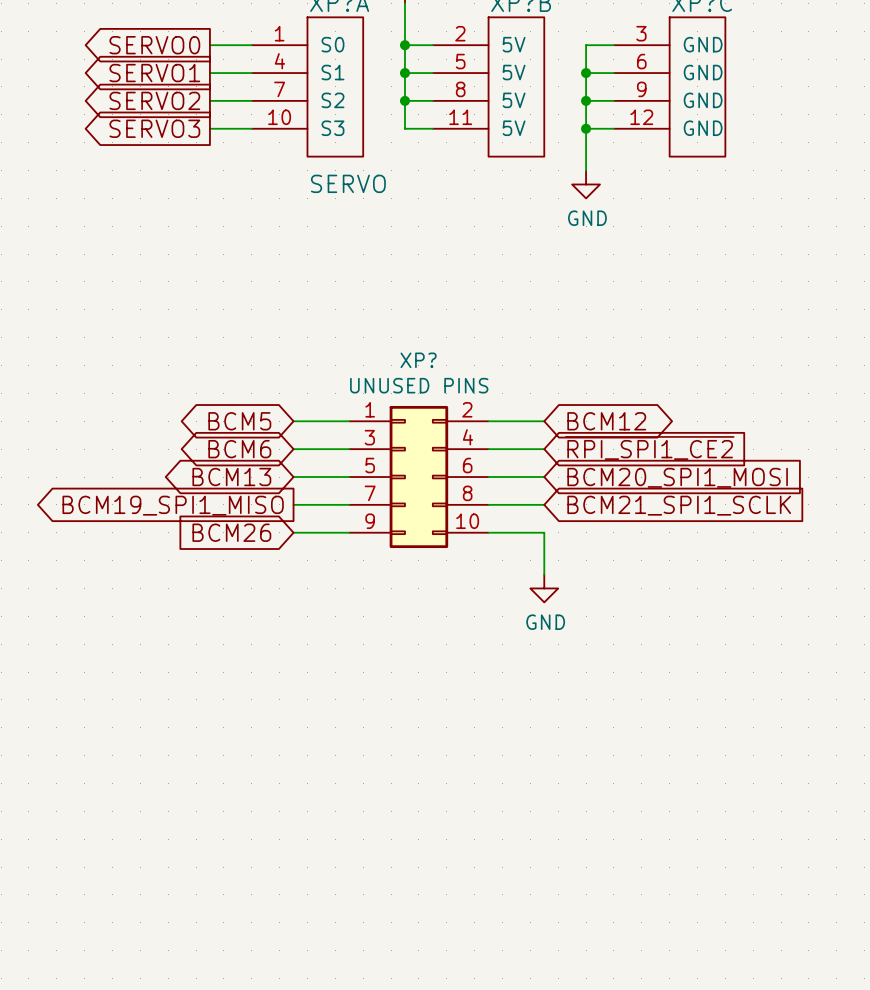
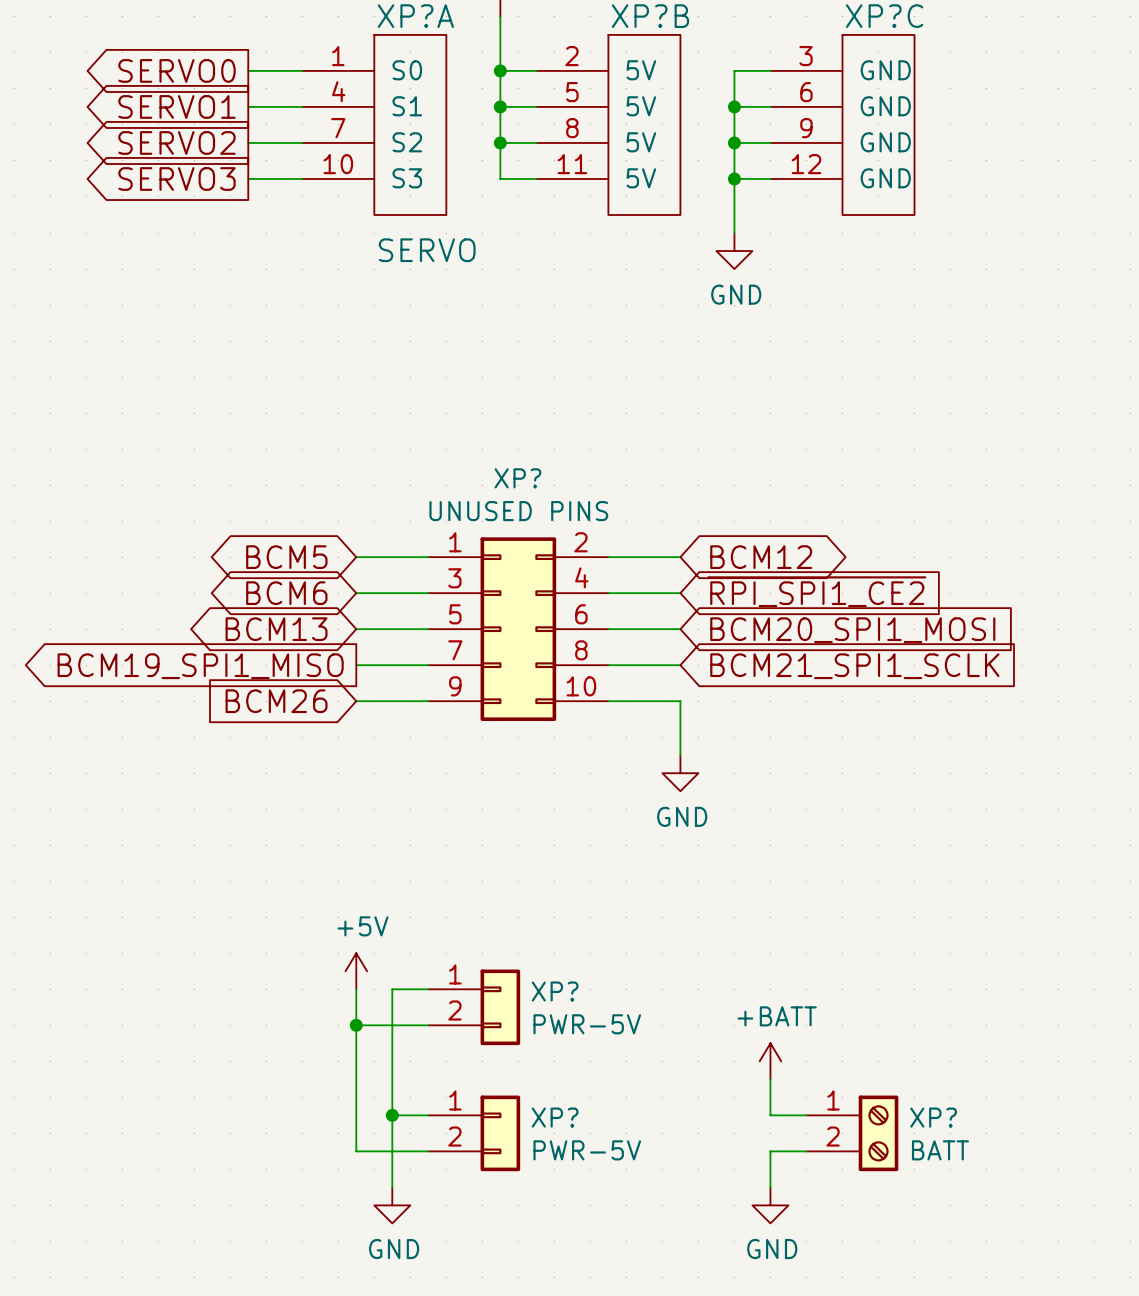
power symbol: none -> +5V (356, 971)
wire: none -> (356, 989) (356, 1151) (428, 1151)
wire: none -> (428, 989) (392, 989) (392, 1187)
XP?: none -> PWR-5V (474, 1007)
wire: none -> (356, 1025) (428, 1025)
junction: none -> (356, 1025)
power symbol: none -> +BATT (770, 1061)
wire: none -> (770, 1079) (770, 1115) (806, 1115)
wire: none -> (392, 1115) (428, 1115)
junction: none -> (392, 1115)
XP?: none -> PWR-5V (474, 1133)
XP?: none -> BATT (852, 1133)
wire: none -> (806, 1151) (770, 1151) (770, 1187)
power symbol: none -> GND (392, 1205)
power symbol: none -> GND (770, 1205)

